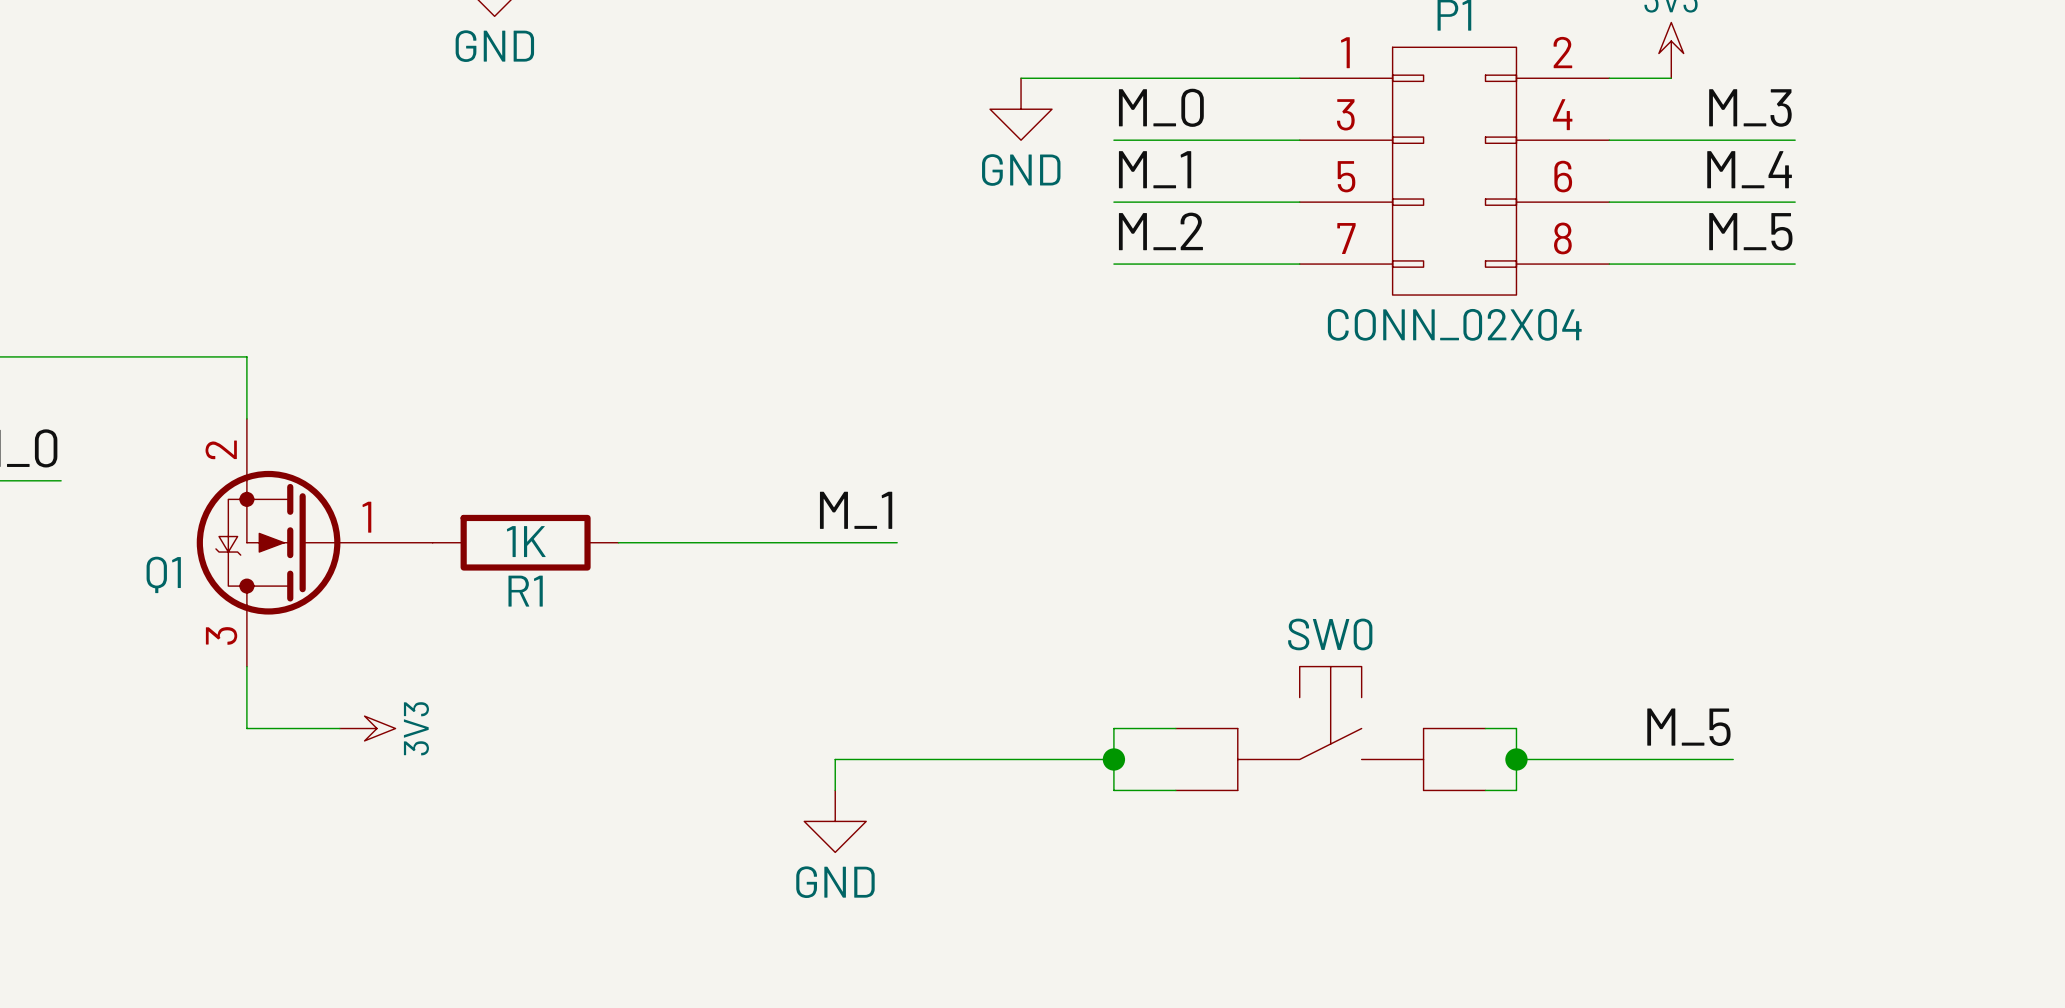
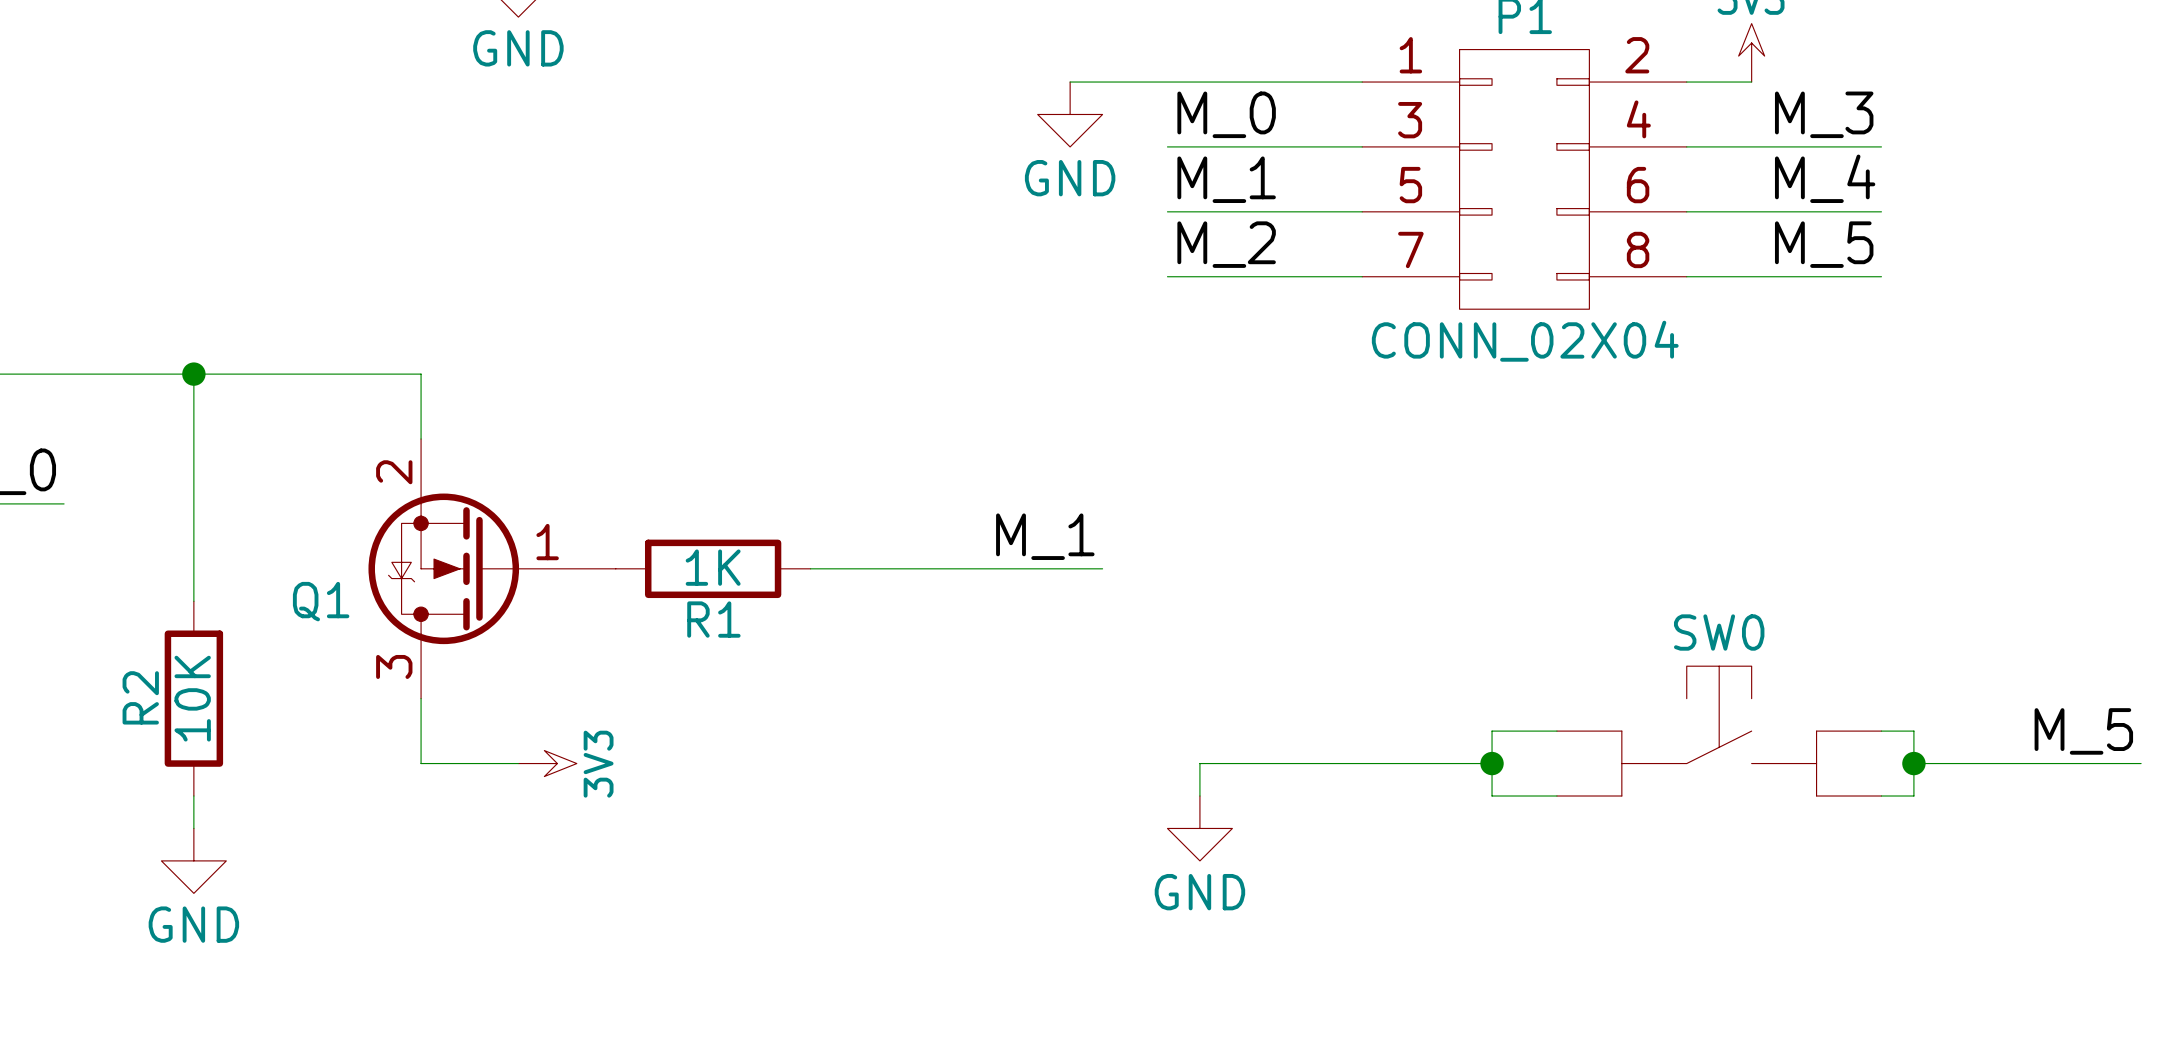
wire: none -> (193, 374) (193, 601)
junction: none -> (193, 374)
wire: (246, 356) (246, 418) -> (258, 374) (421, 374) (421, 439)
label position: M_1 (856, 510) -> M_1 (1045, 536)
Q1 position: (314, 542) -> (492, 568)
R1 position: (525, 542) -> (713, 568)
wire: (618, 542) (773, 542) -> (940, 568) (1102, 568)
R2: none -> 10K (193, 698)
wire: (246, 666) (246, 728) (339, 728) -> (421, 698) (421, 763) (518, 763)
wire: none -> (1556, 731) (1492, 731) (1492, 796) (1556, 796)
label position: M_5 (1688, 727) -> M_5 (2083, 731)
power symbol position: 3V3 (367, 728) -> 3V3 (547, 763)
wire: (1144, 728) (1113, 728) (1113, 790) (1175, 790) -> (1199, 763) (1199, 796)
wire: none -> (1232, 763) (1492, 763)
SW0 position: (1330, 728) -> (1719, 731)
wire: (1485, 728) (1516, 728) (1516, 790) (1485, 790) -> (1881, 731) (1913, 731) (1913, 796) (1881, 796)
junction: none -> (1913, 763)
wire: none -> (193, 796) (193, 828)
wire: (1113, 759) (835, 759) (835, 790) -> none
junction: (1113, 759) -> none
wire: (1516, 759) (1733, 759) -> (1913, 763) (2141, 763)
junction position: (1516, 759) -> (1492, 763)
power symbol: none -> GND (193, 860)
power symbol position: GND (835, 821) -> GND (1199, 828)

